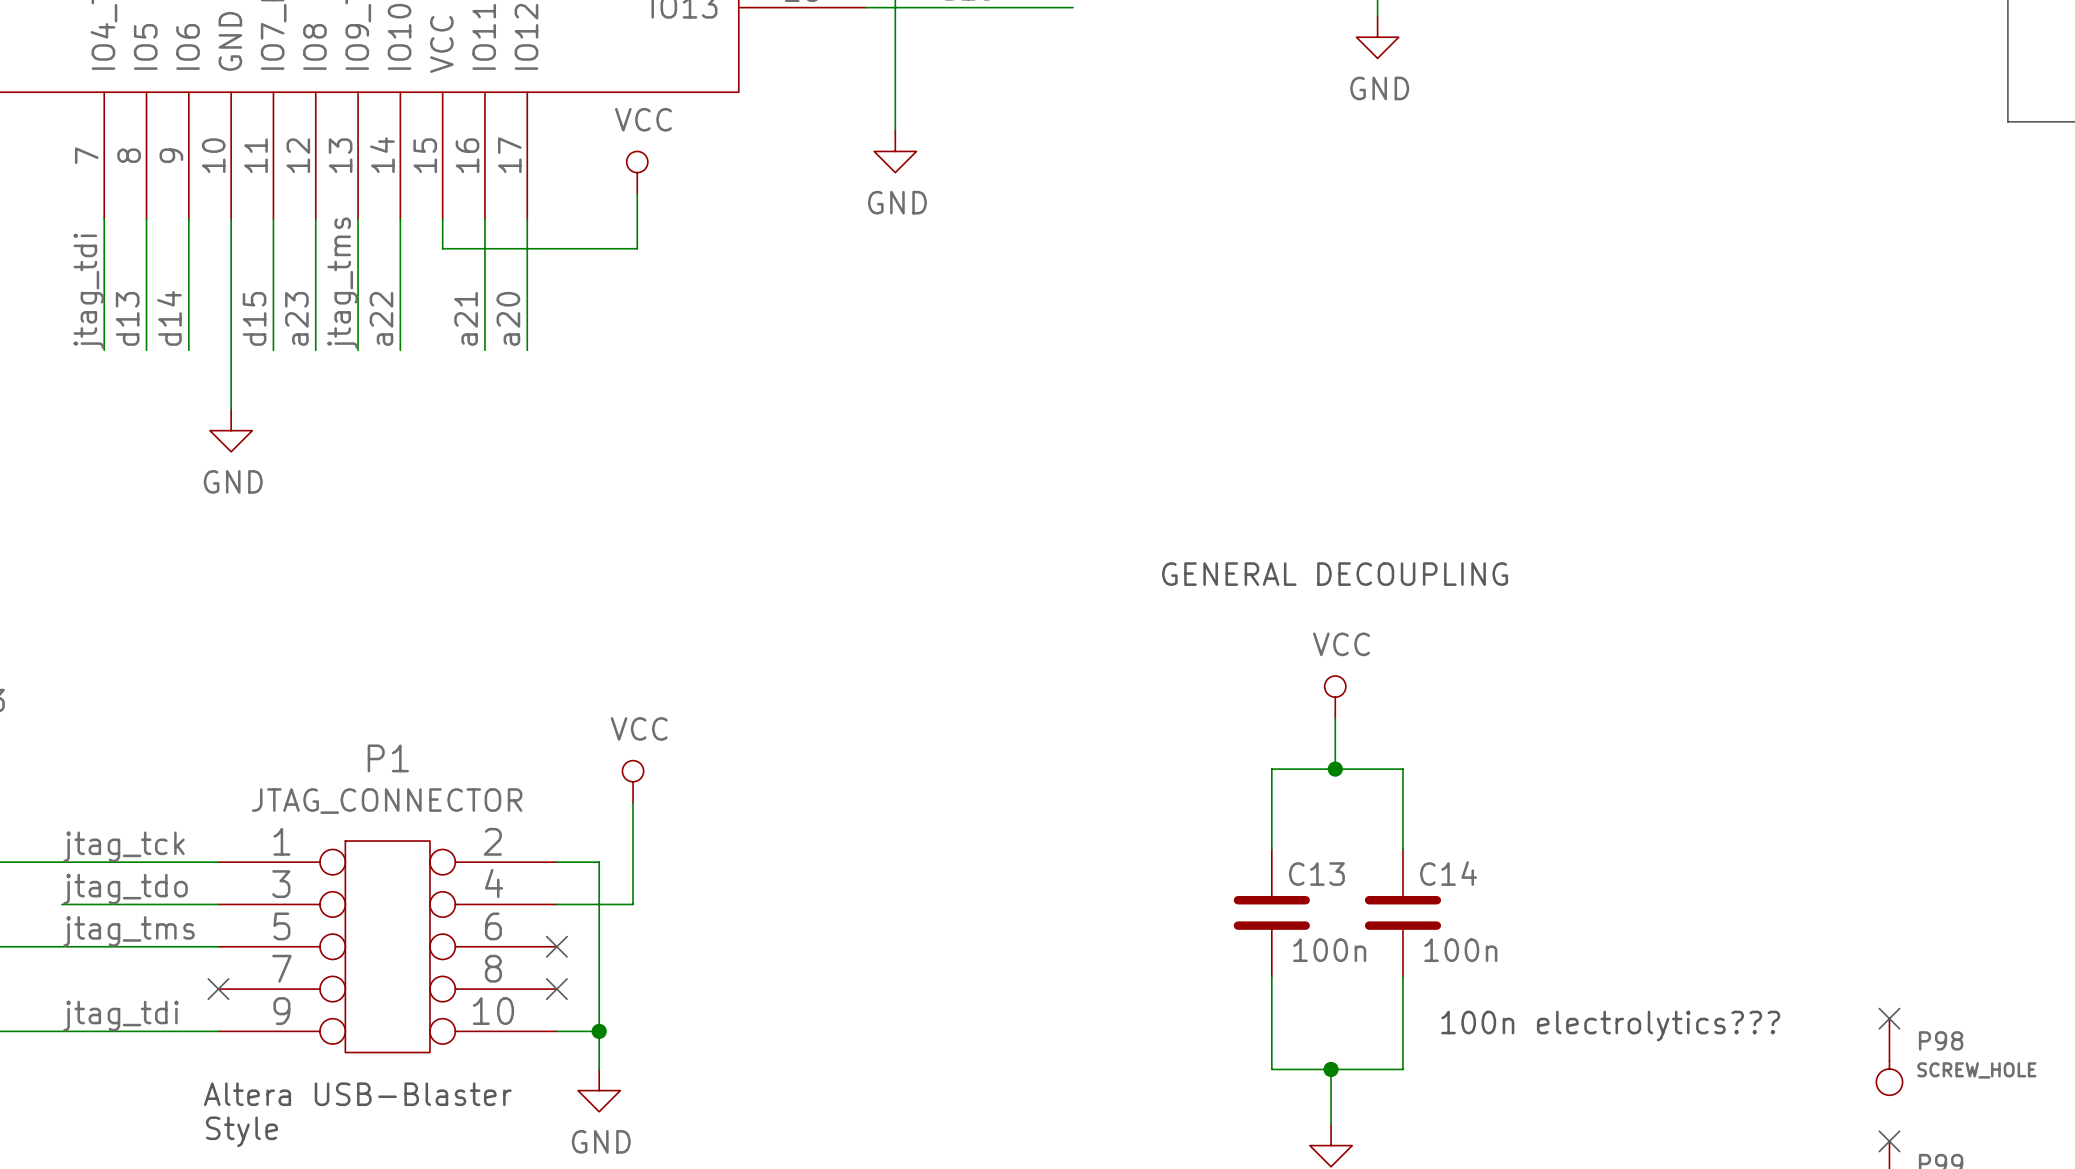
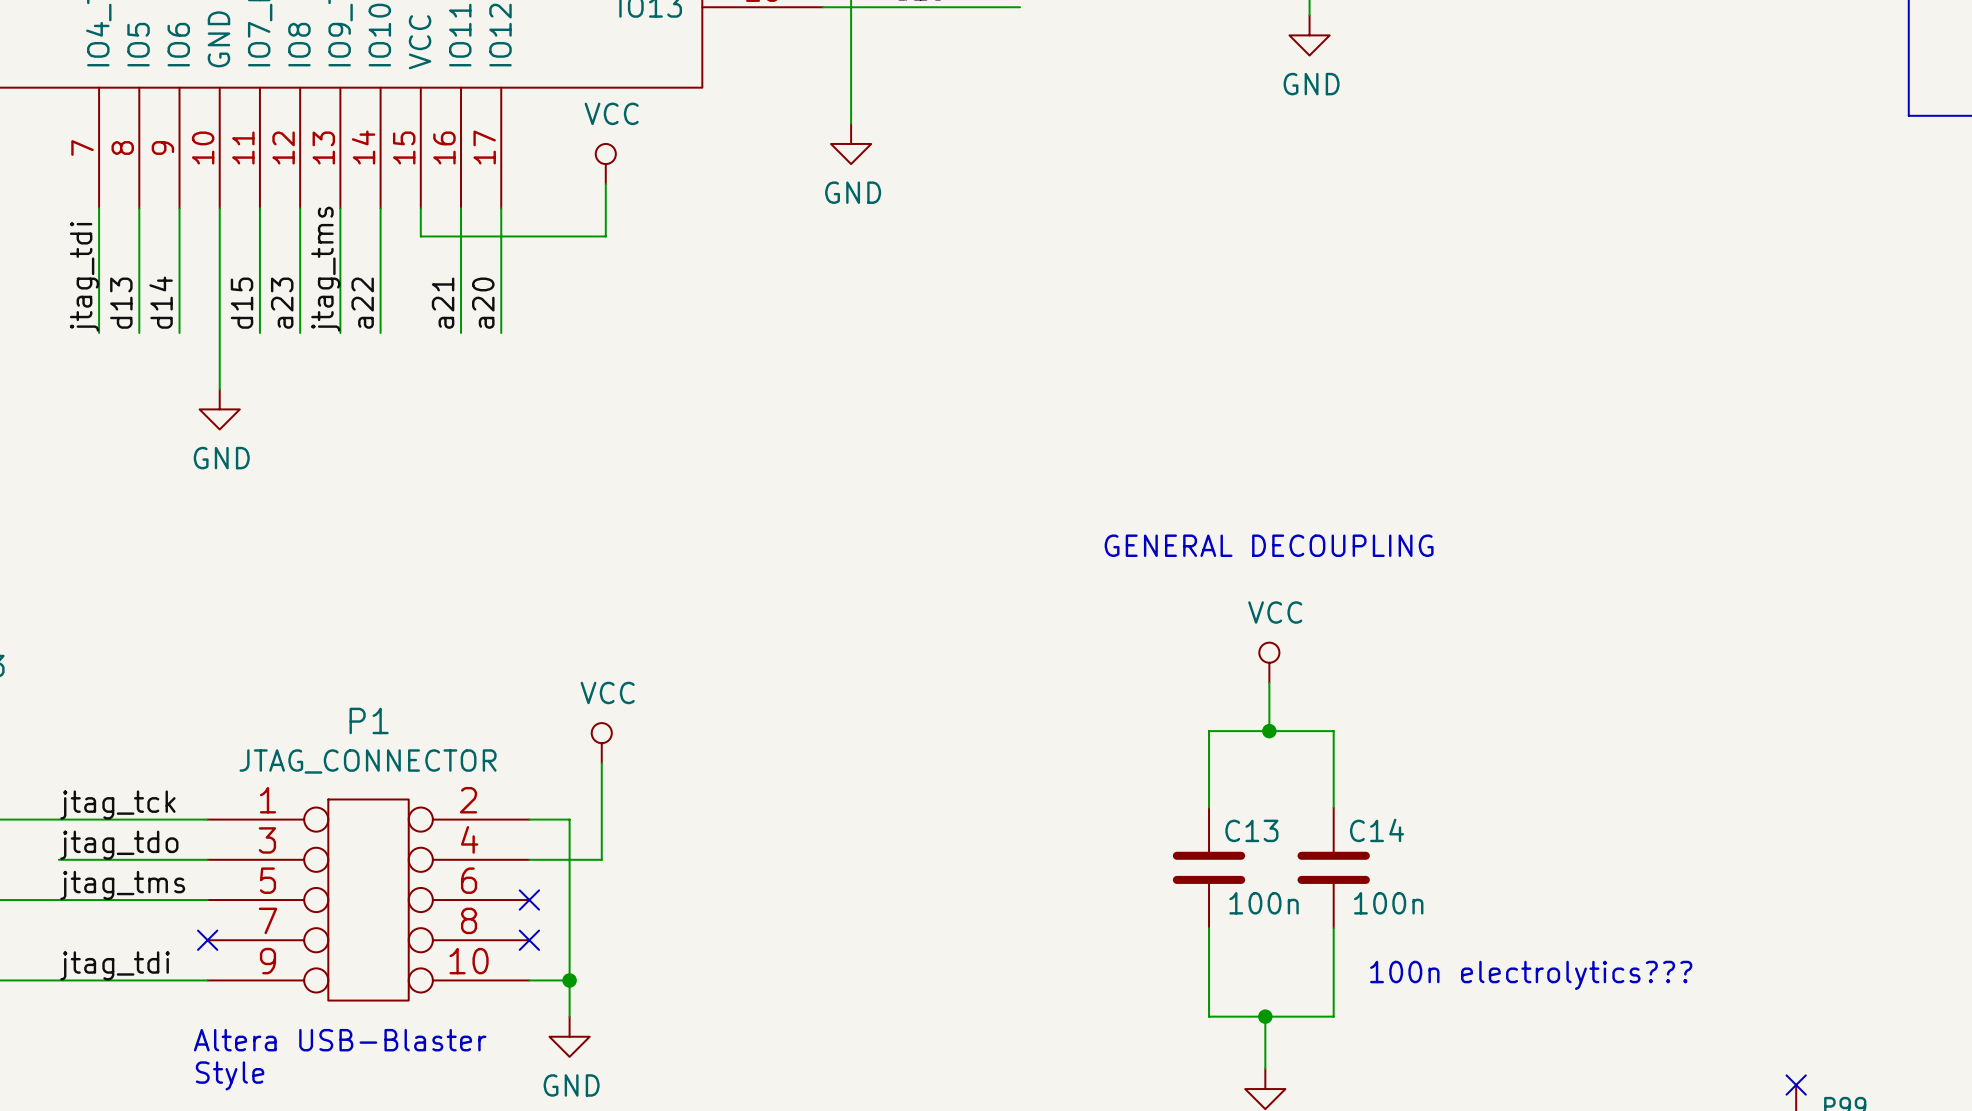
no-connect mark: (1889, 1018) -> none
P98: SCREW_HOLE (1889, 1056) -> none

